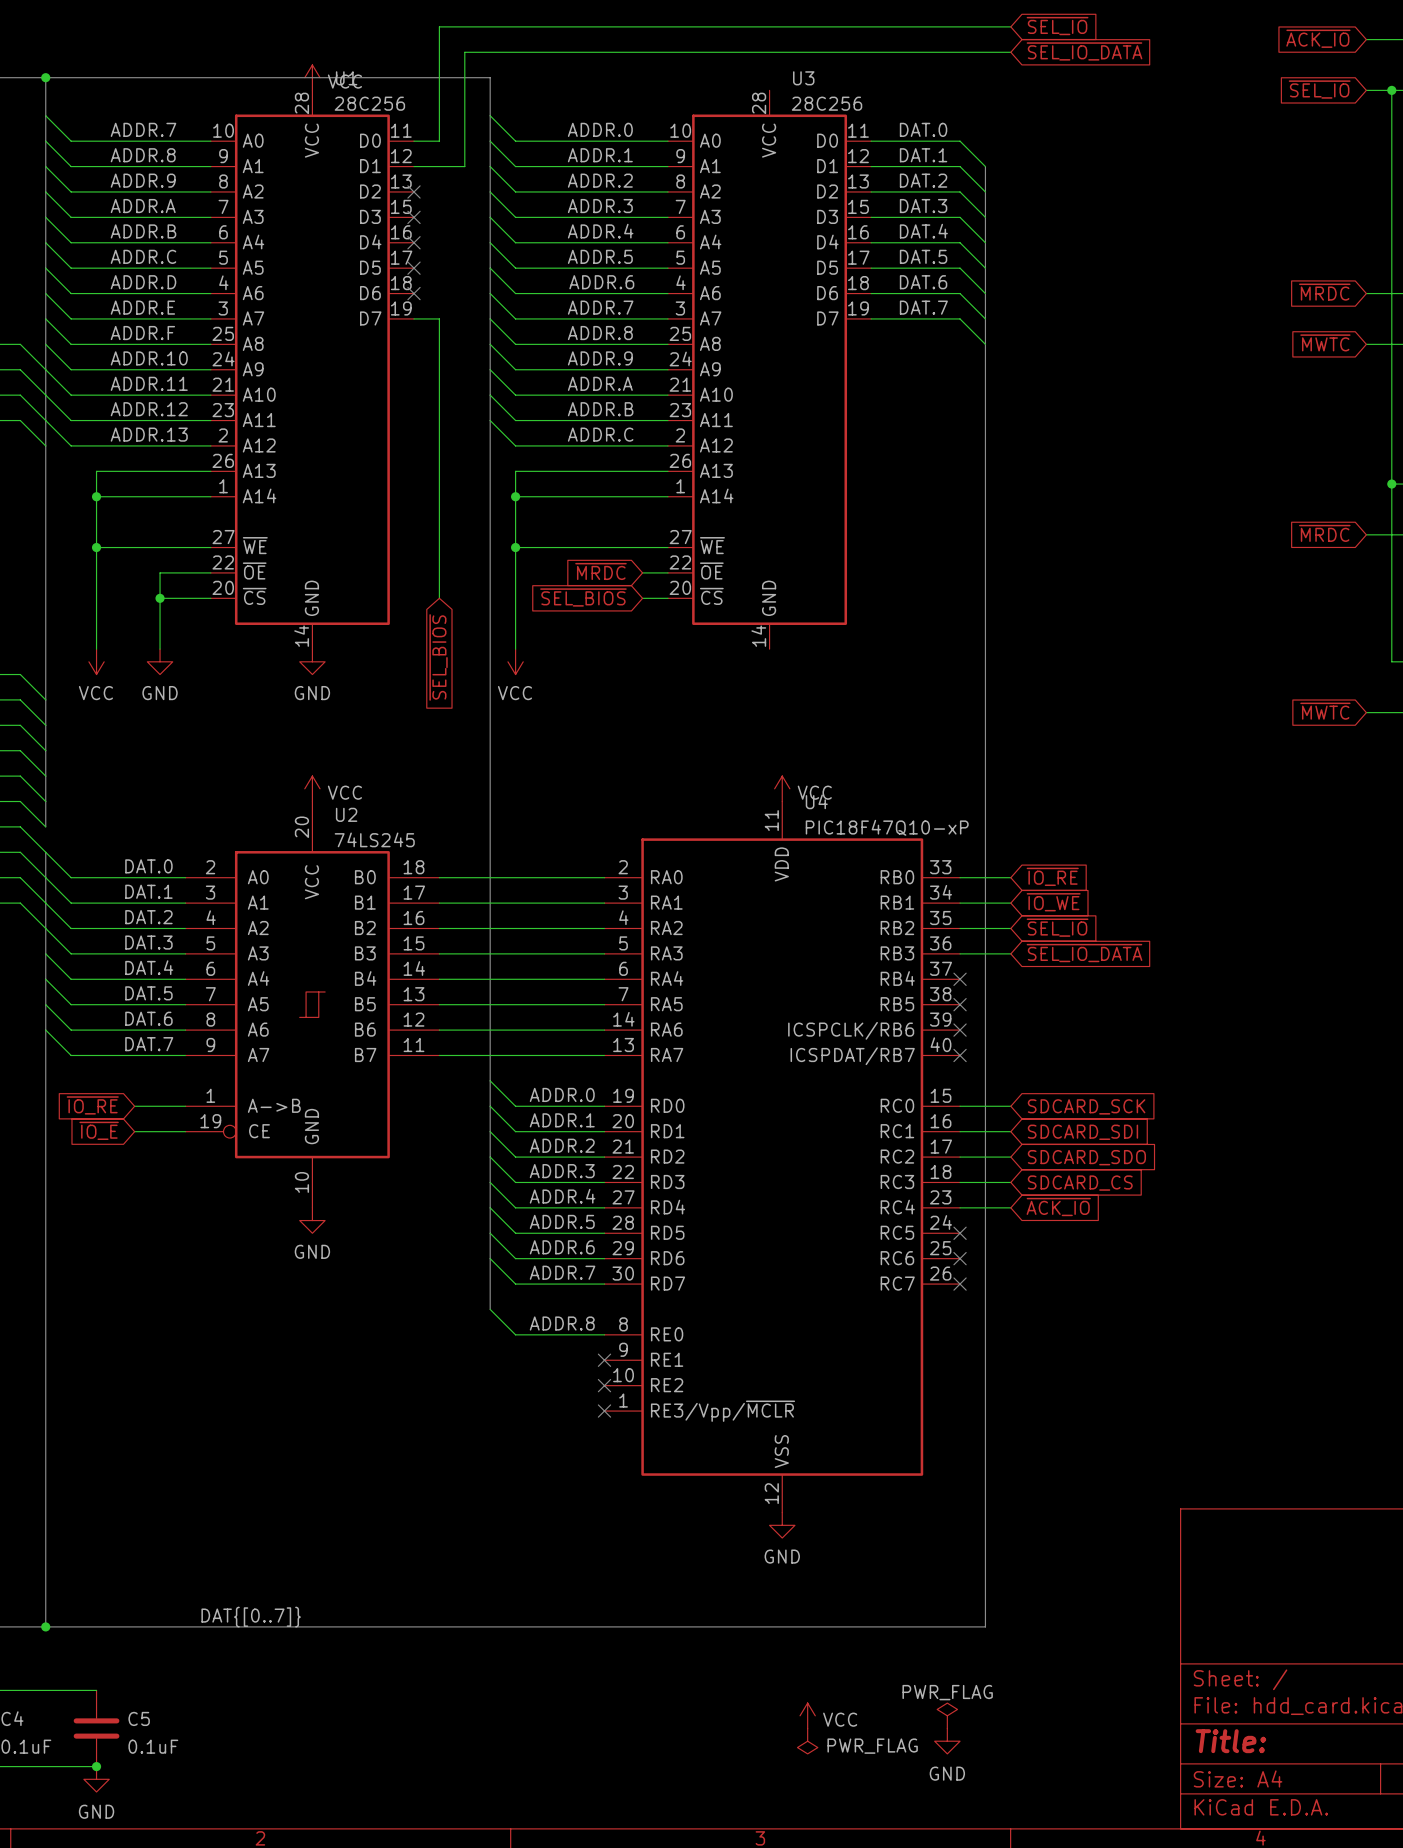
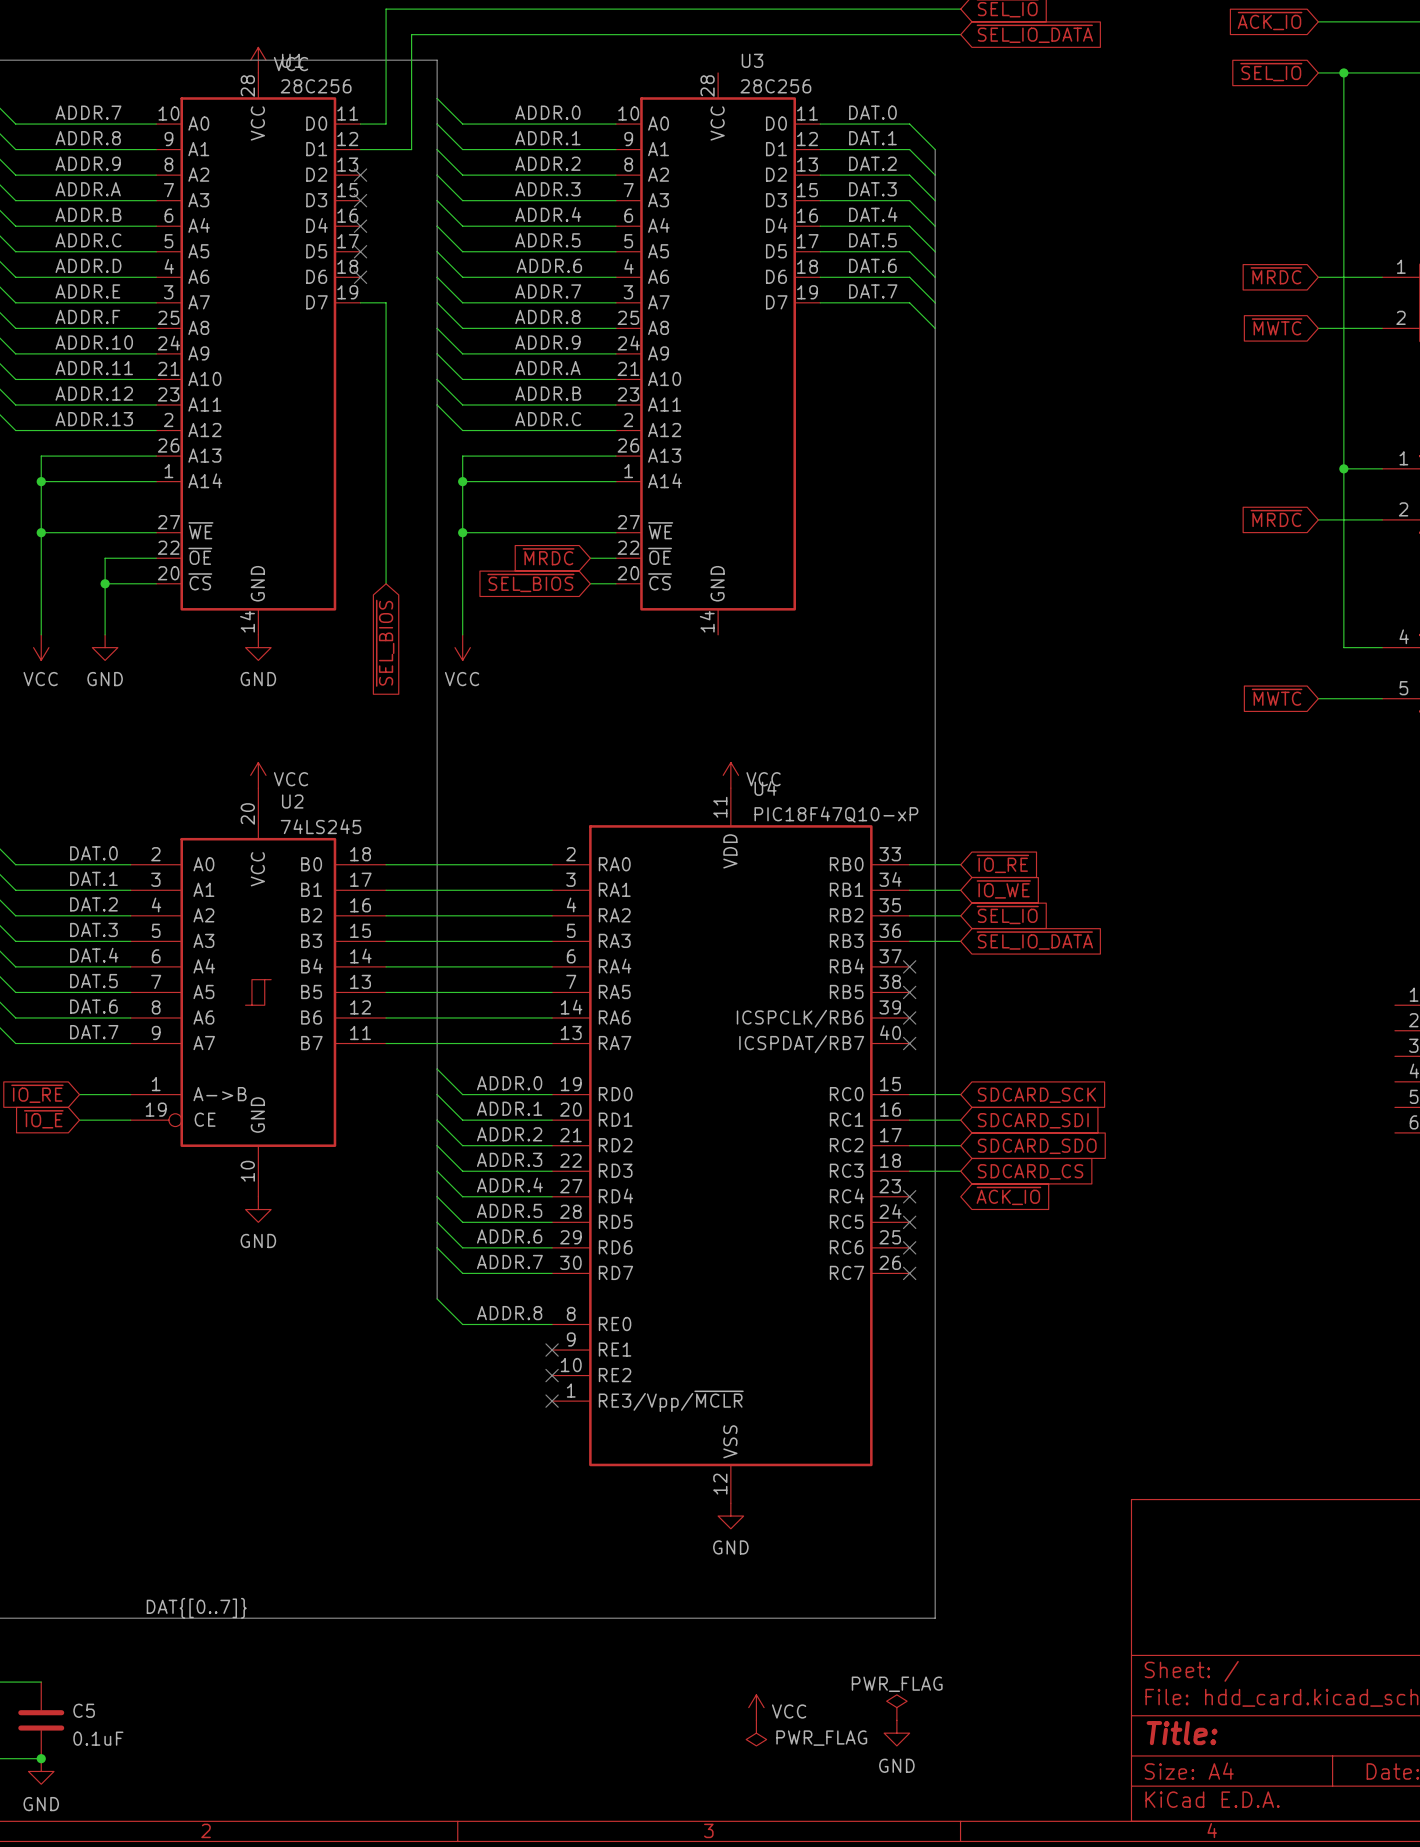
wire: (960, 1207) (1010, 1207) -> none
no-connect mark: none -> (909, 1196)

